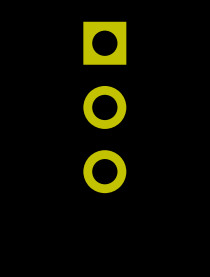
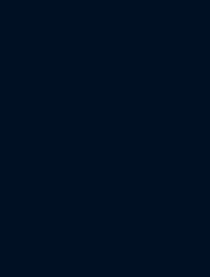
part: (104, 107) -> none

